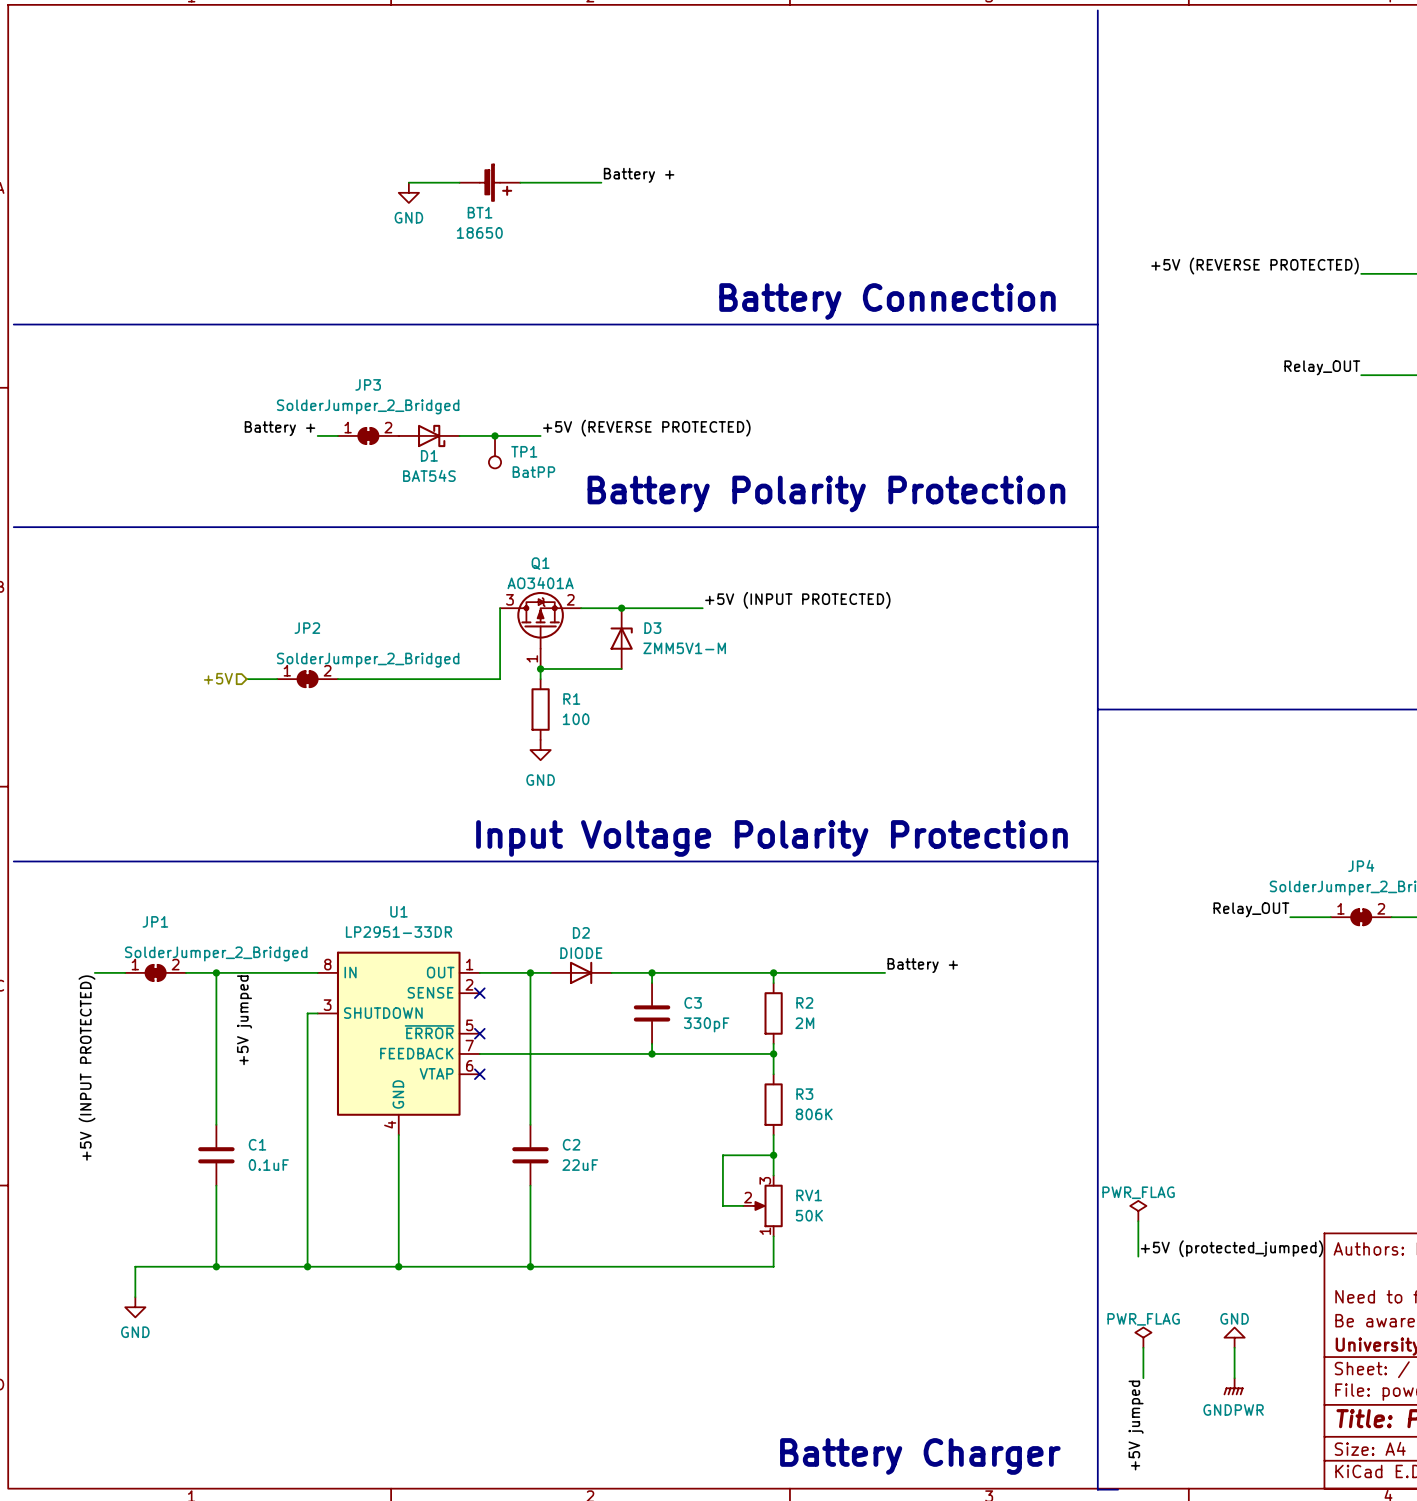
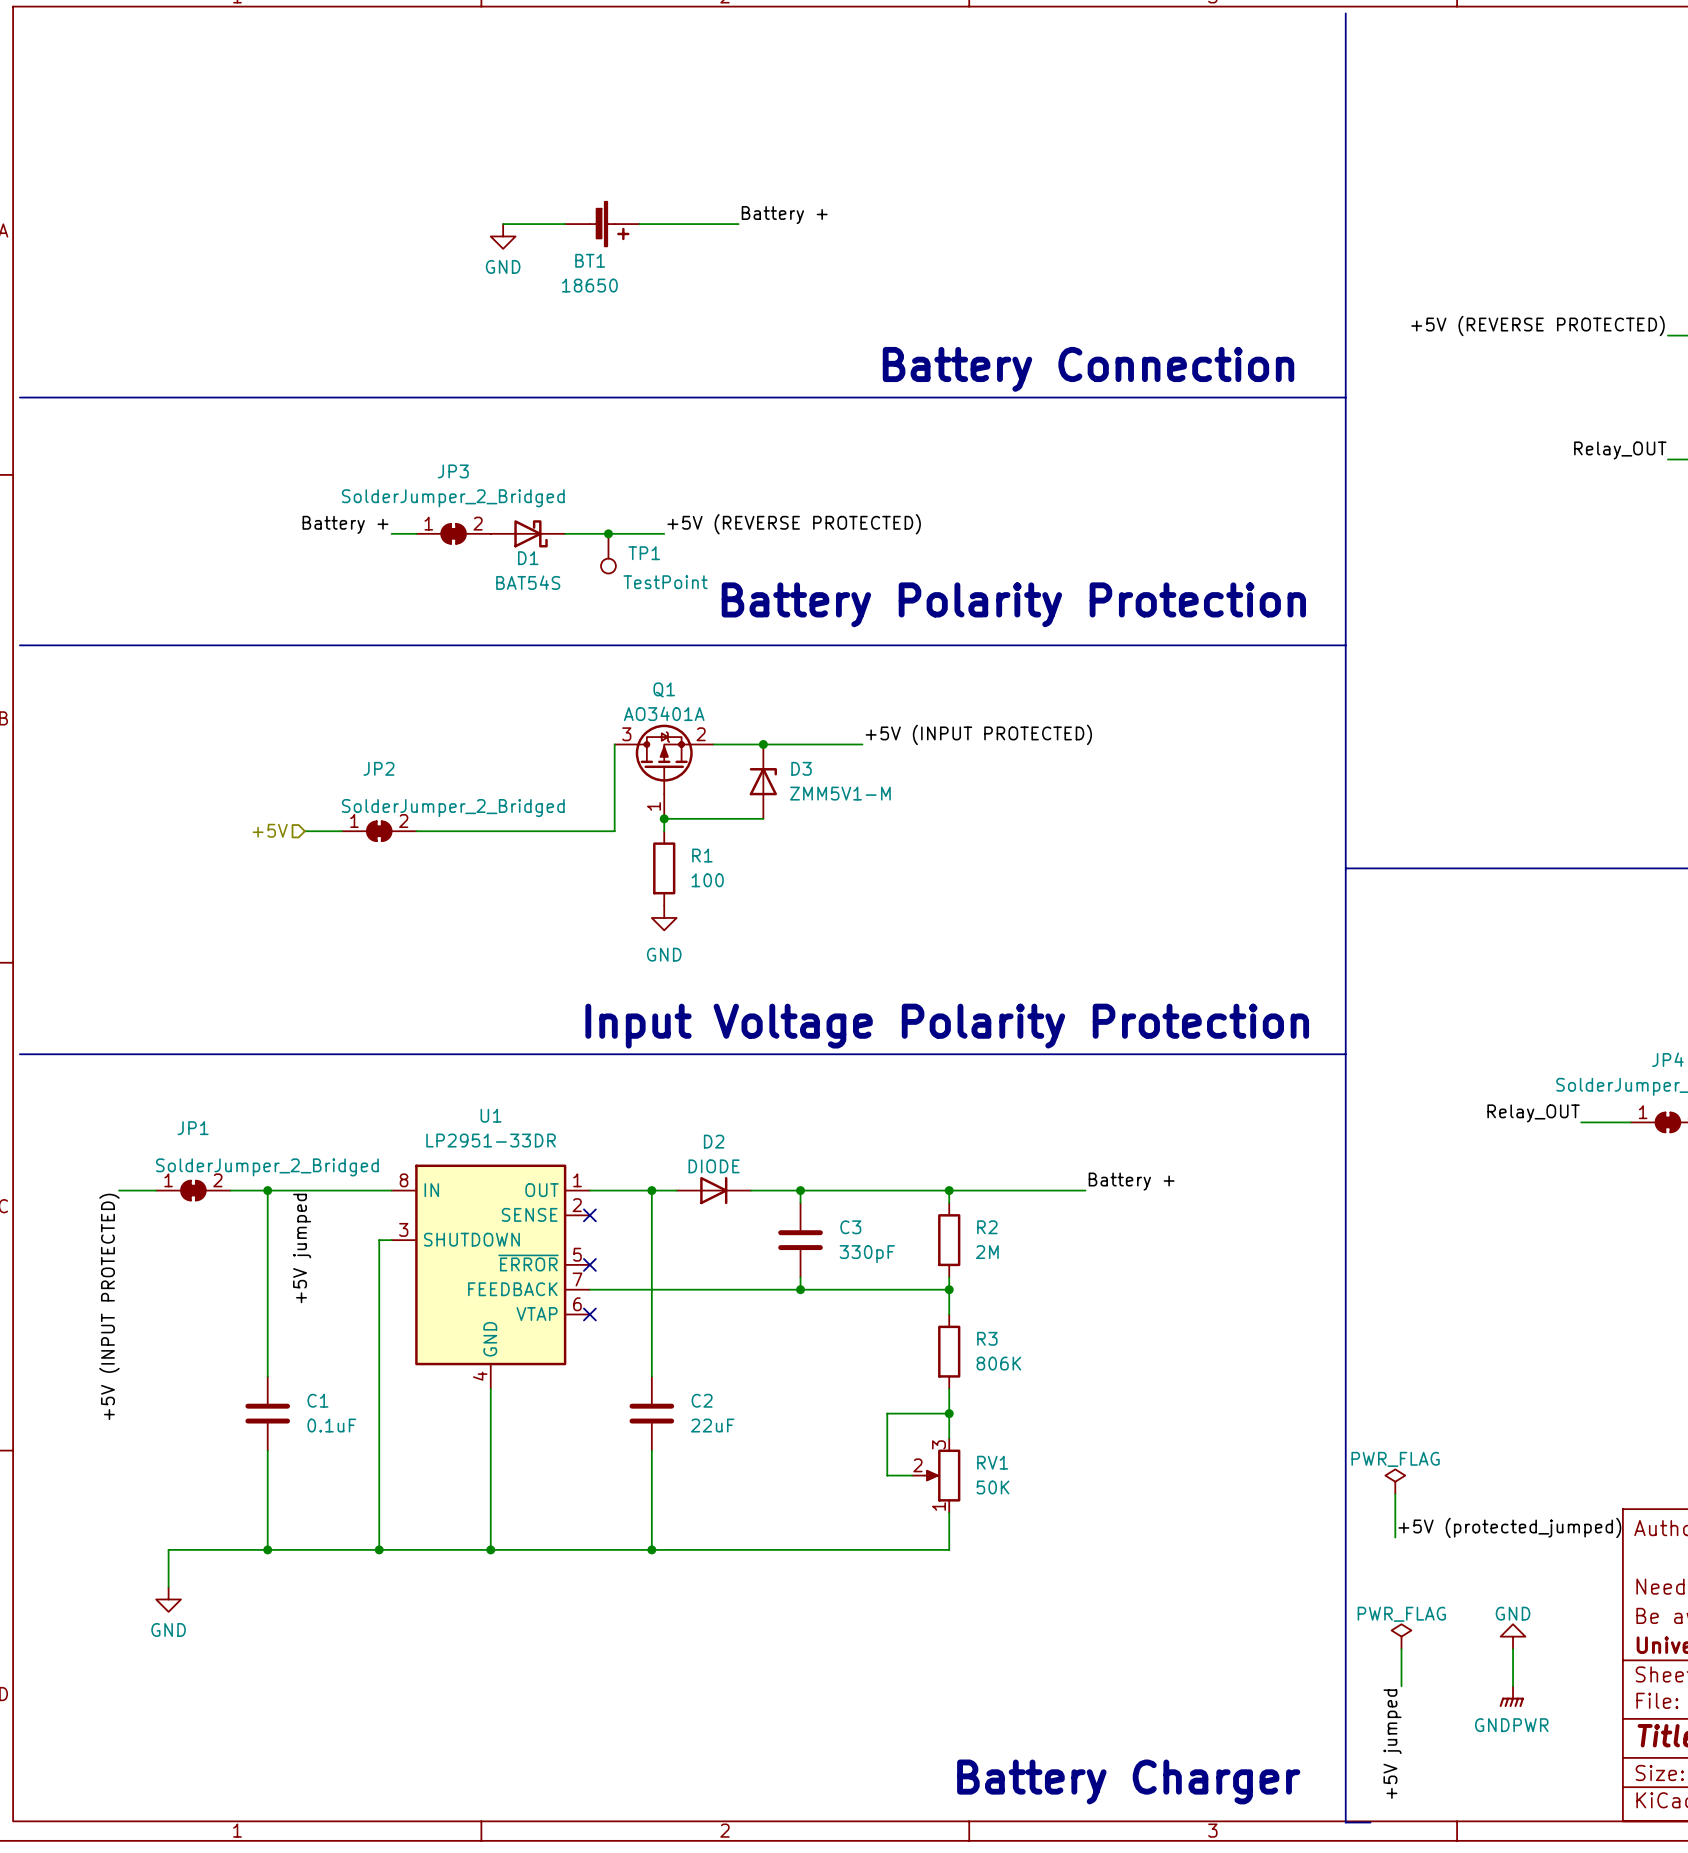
TP1 value: BatPP (533, 472) -> TestPoint (665, 582)

